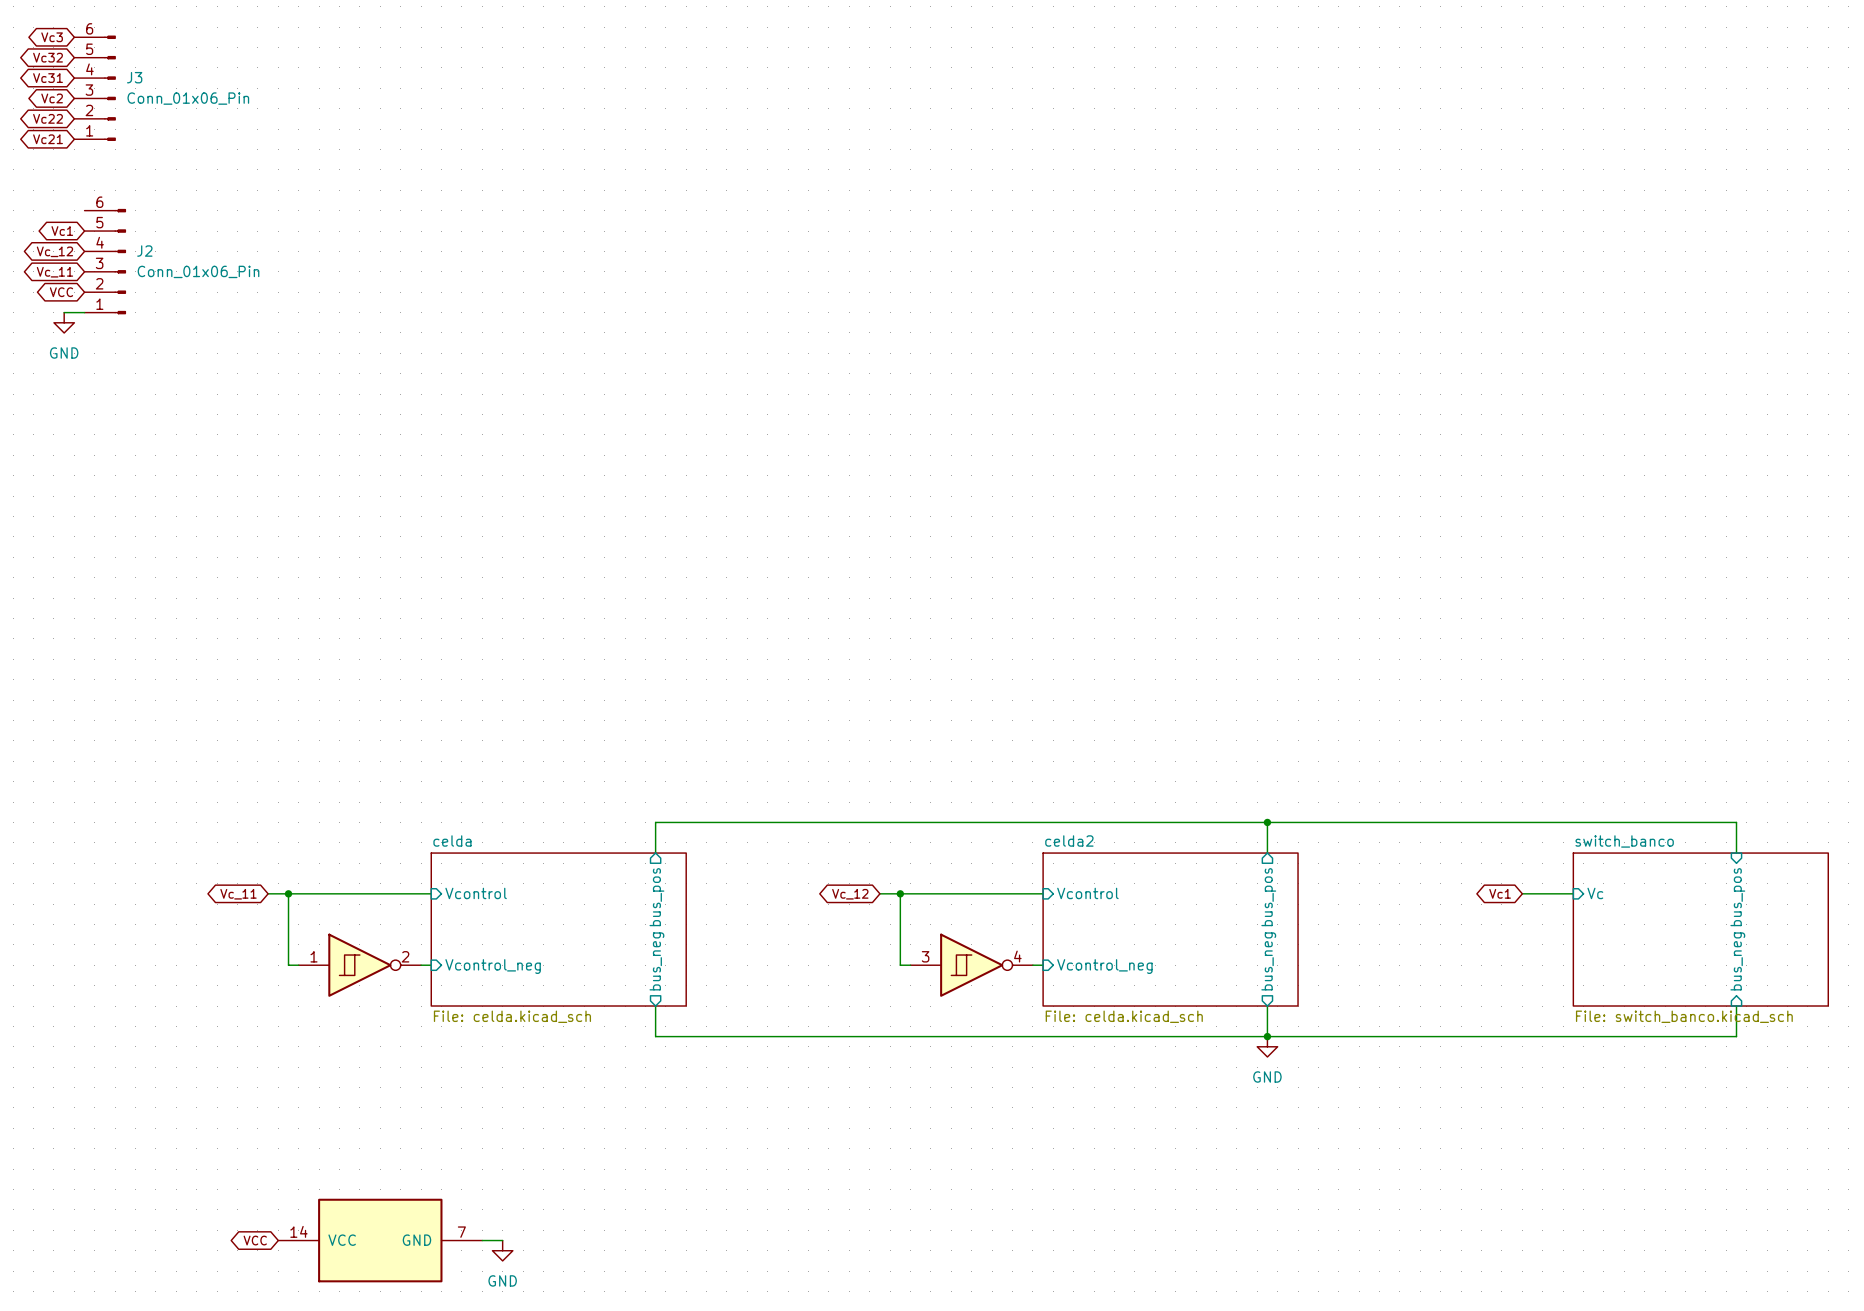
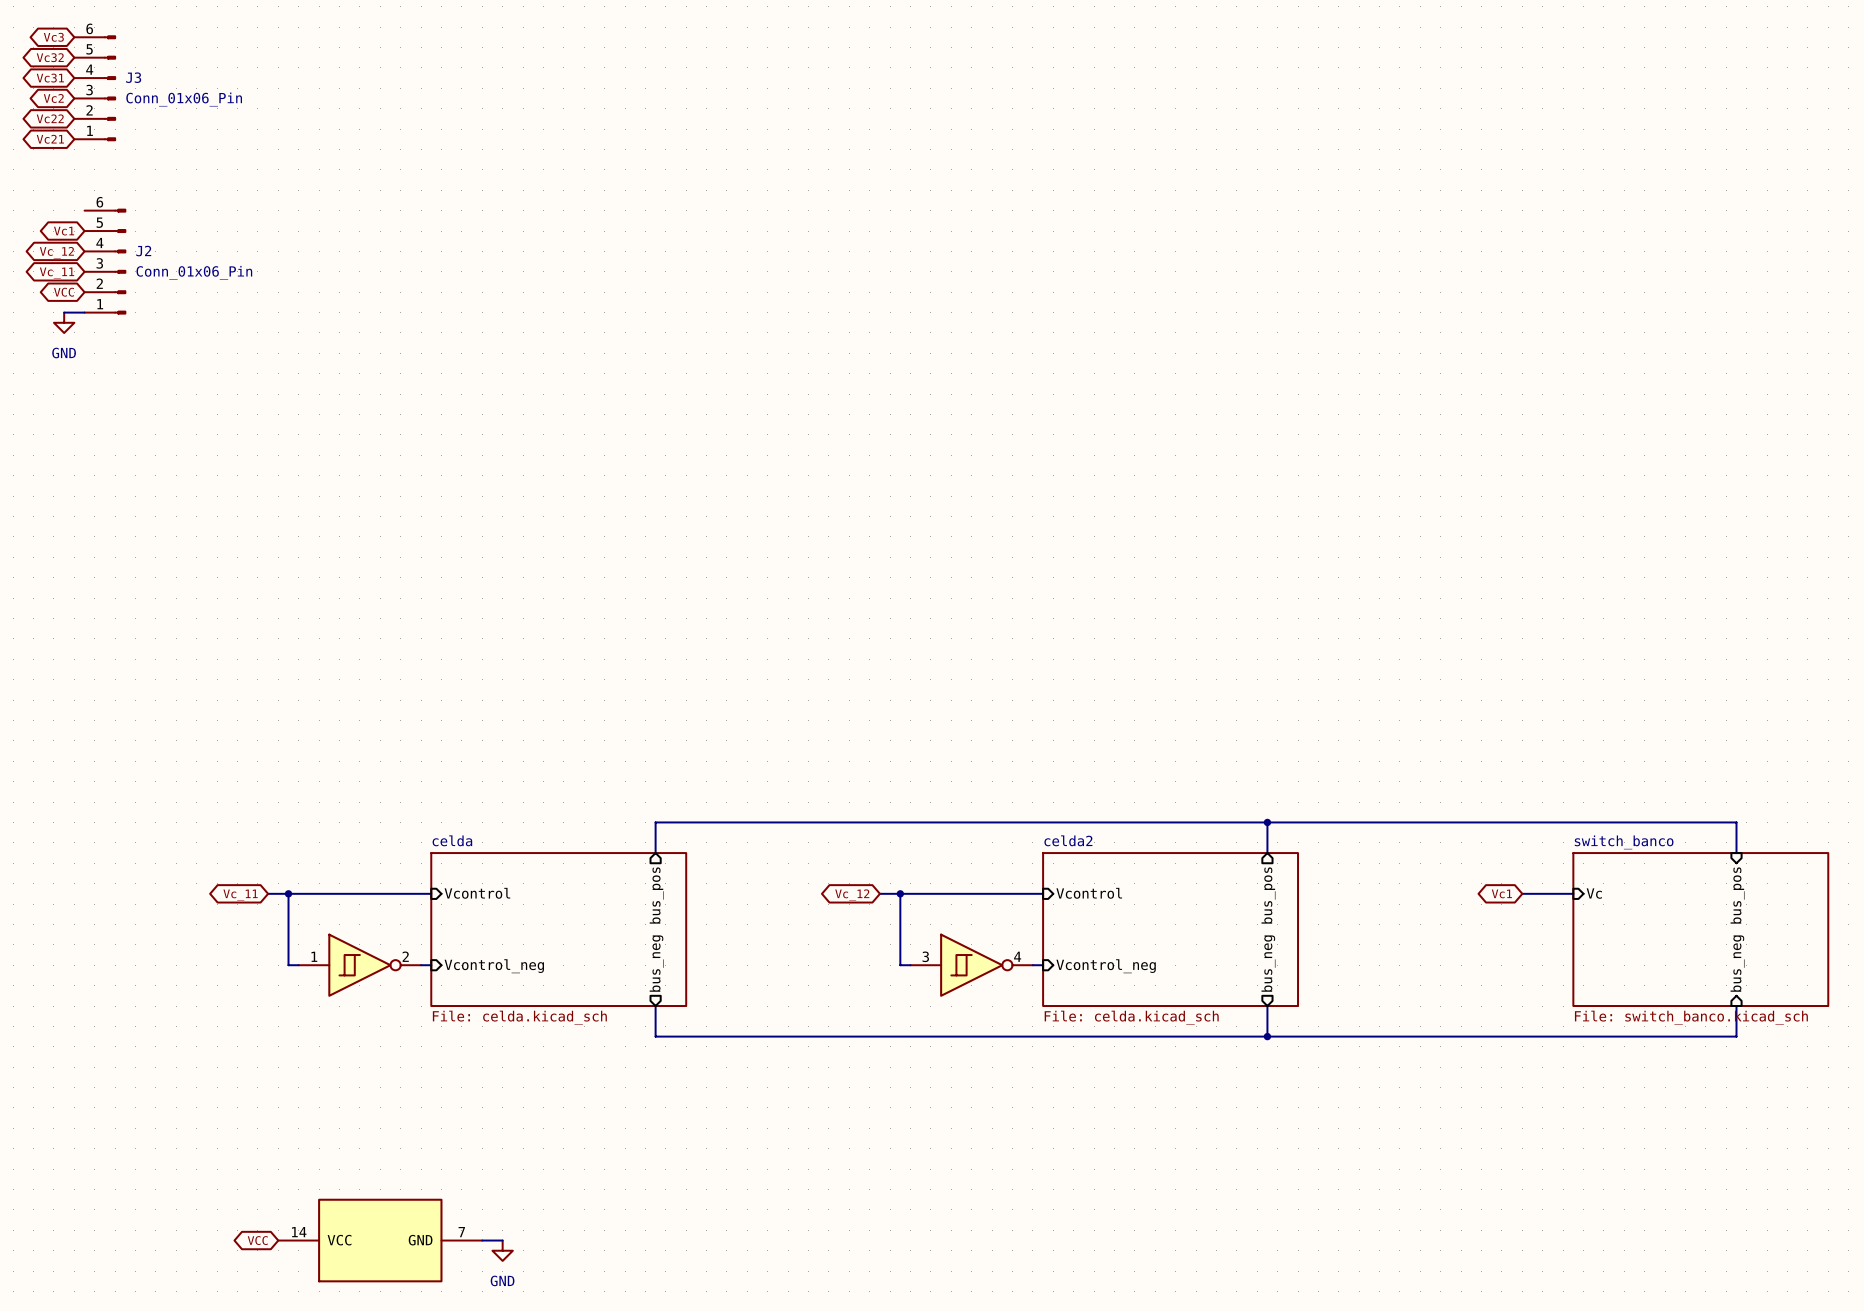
power symbol: GND (1267, 1046) -> none

